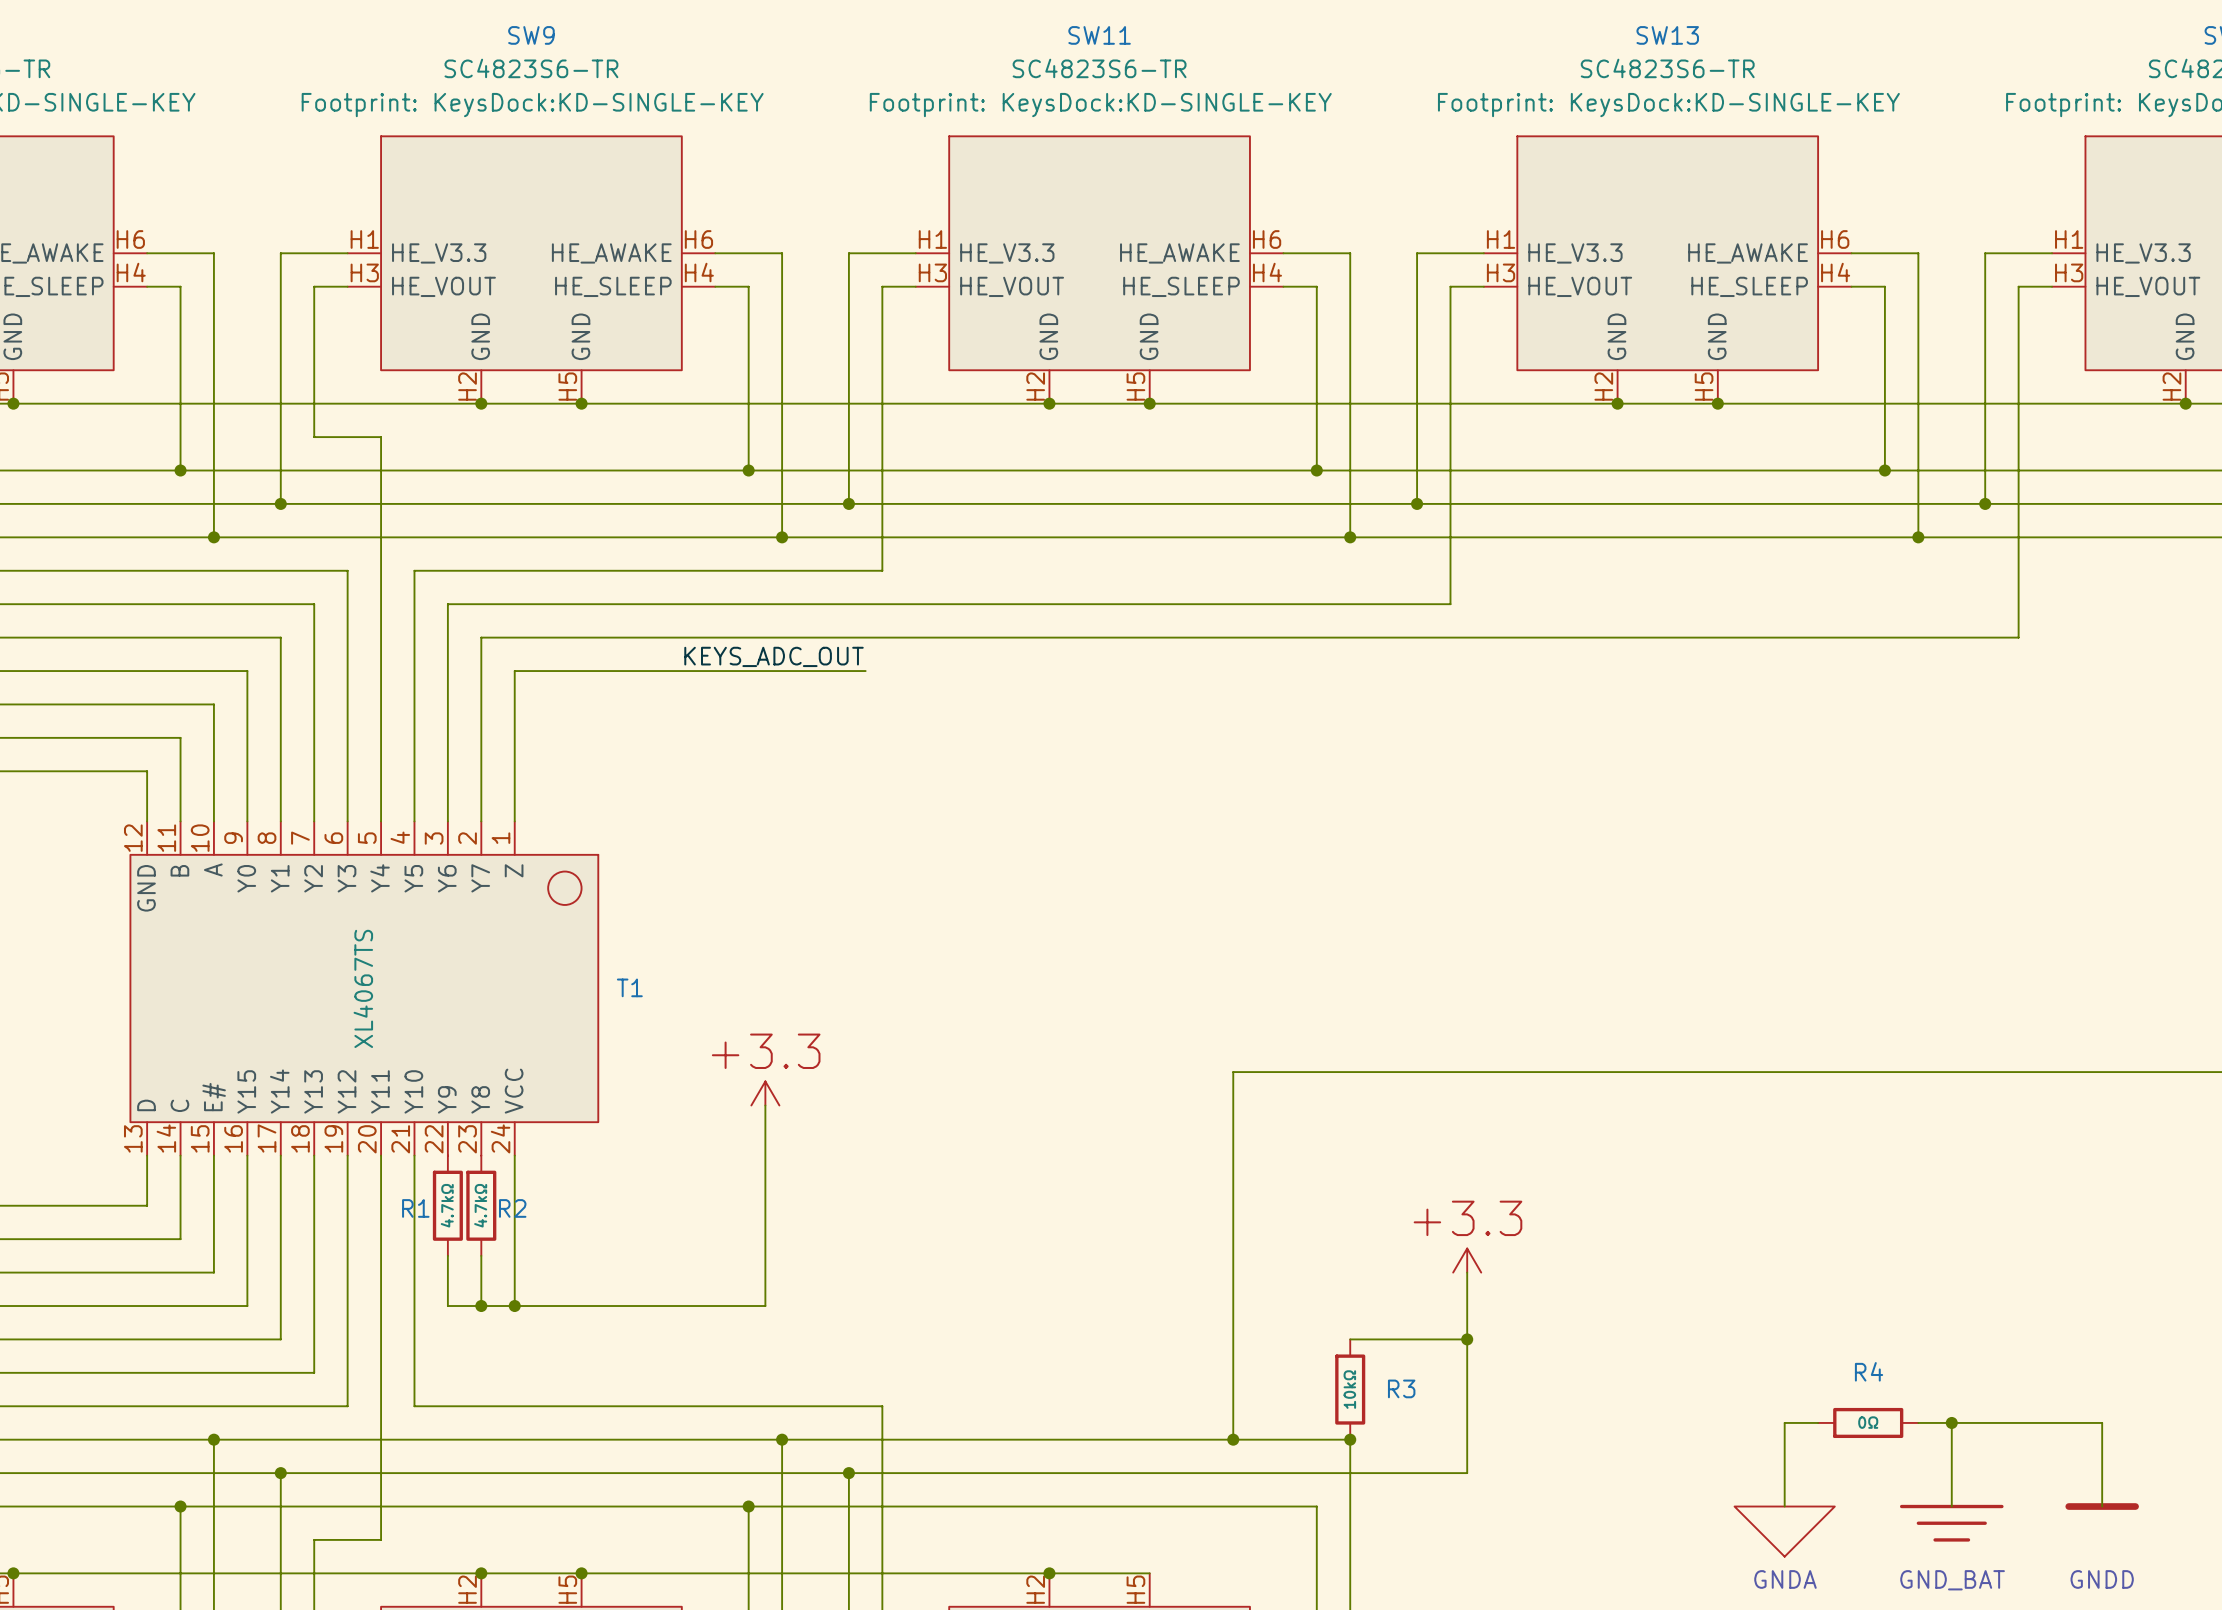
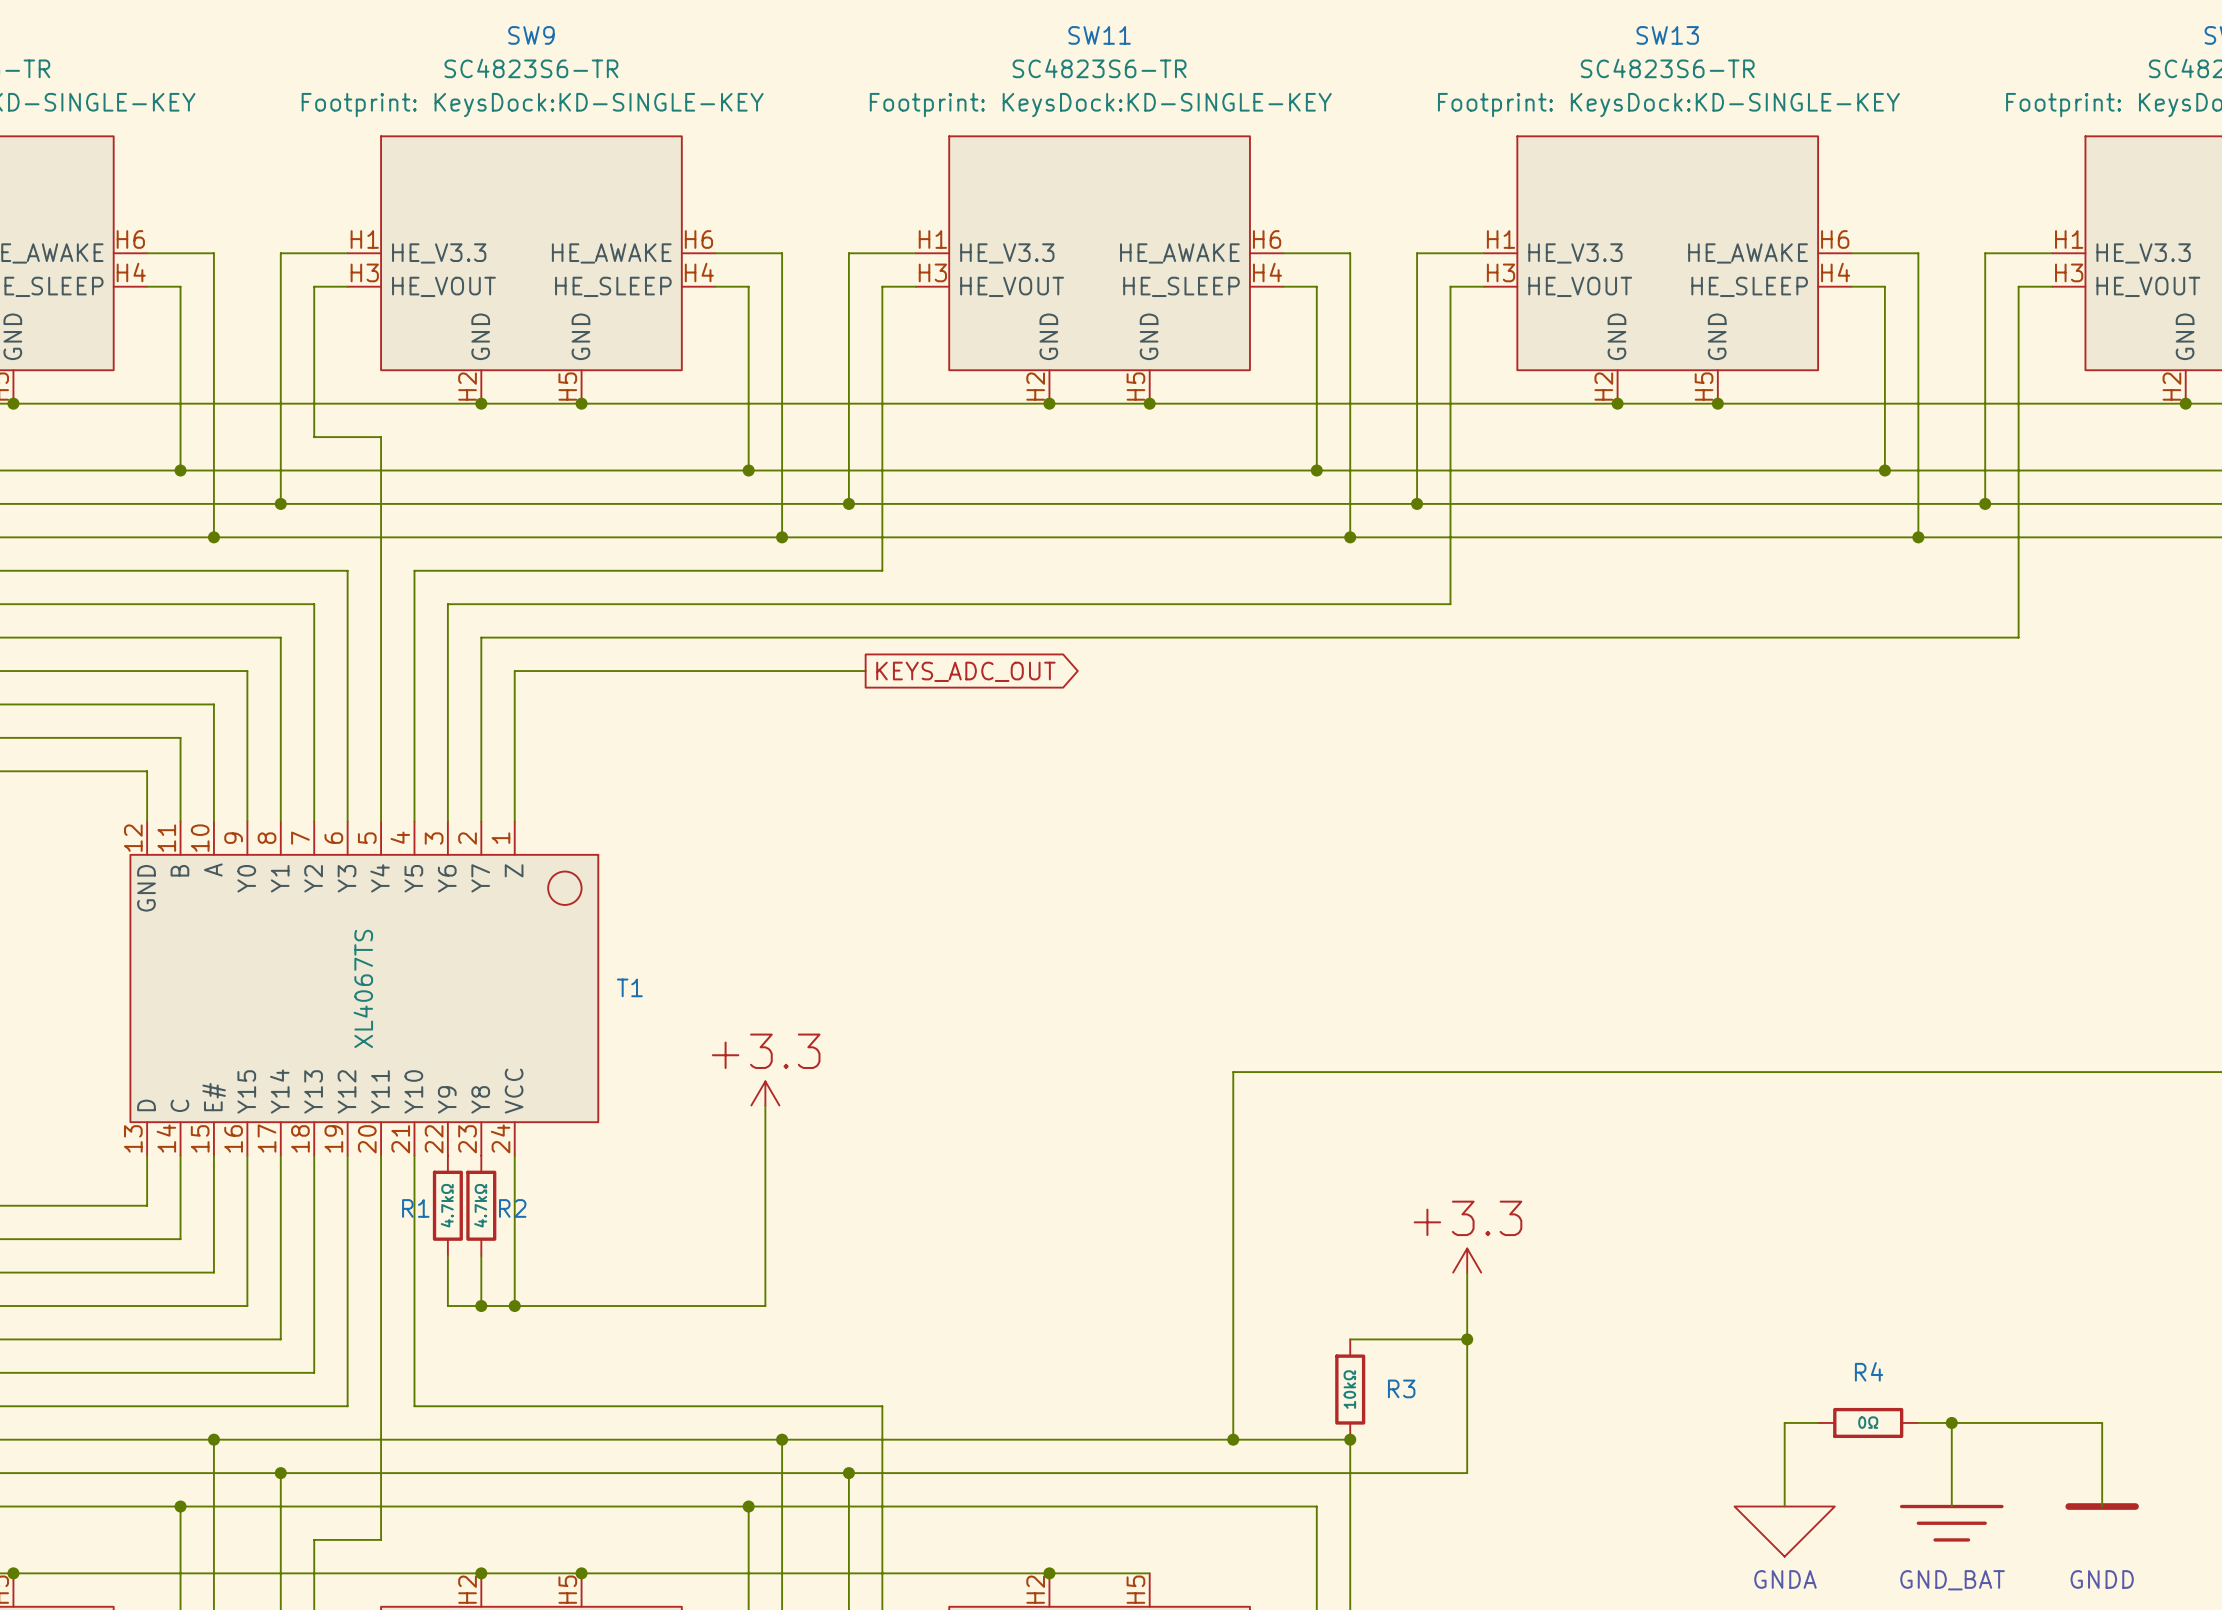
label: KEYS_ADC_OUT (774, 656) -> none
global label: none -> KEYS_ADC_OUT (965, 671)

